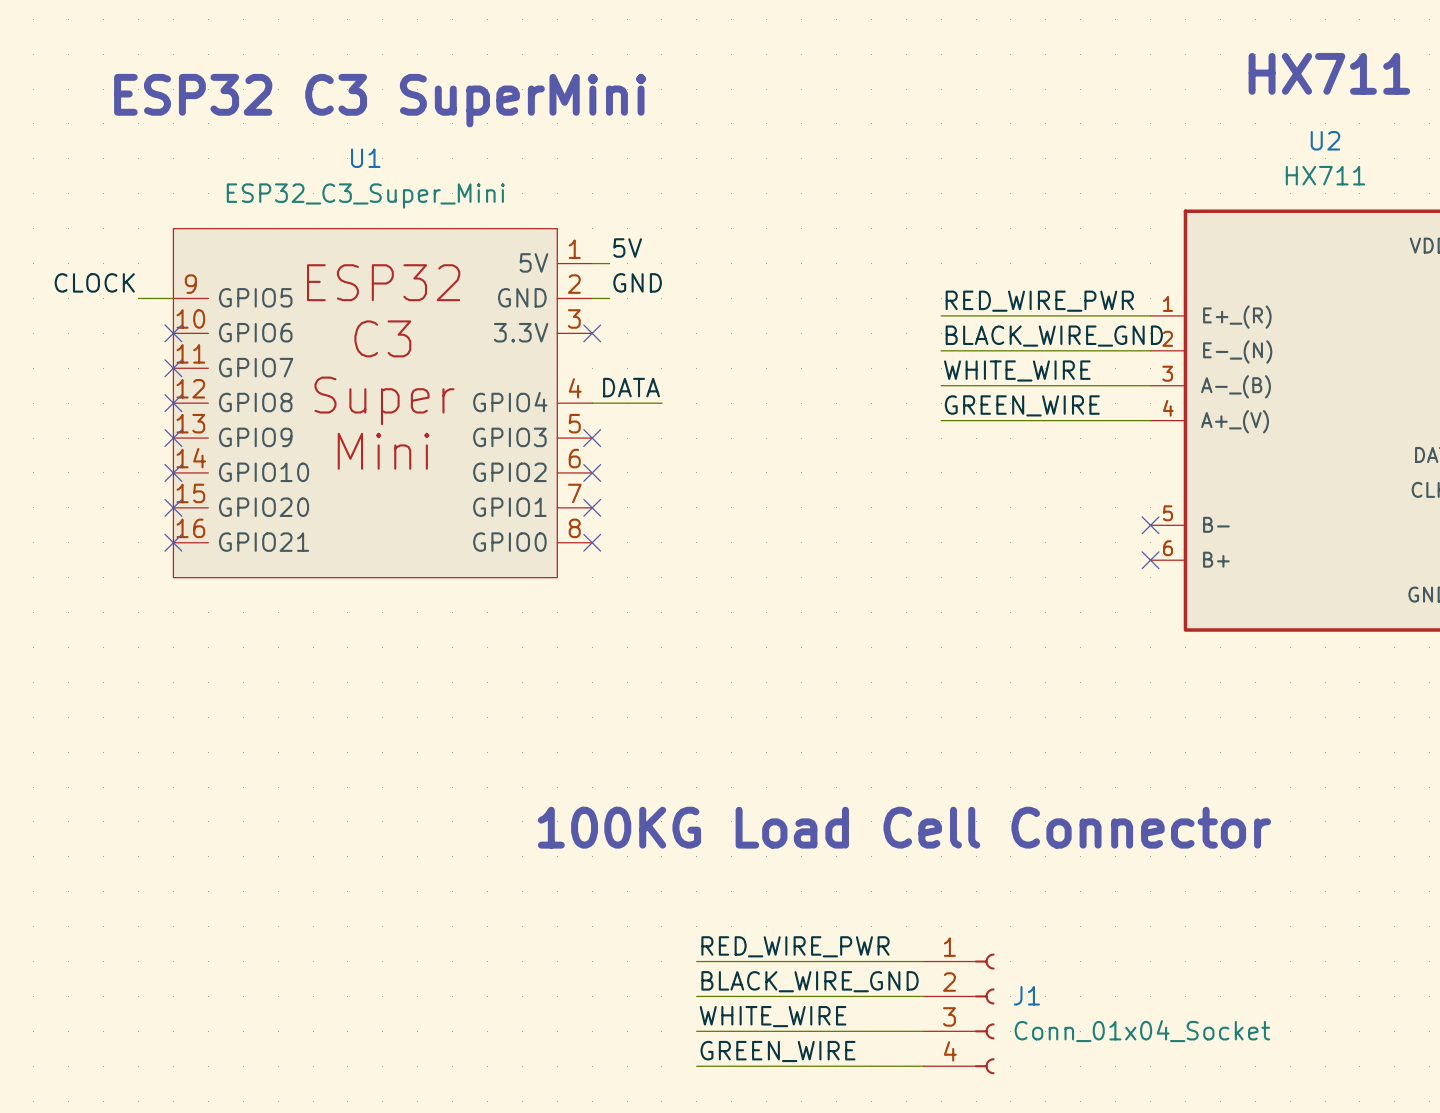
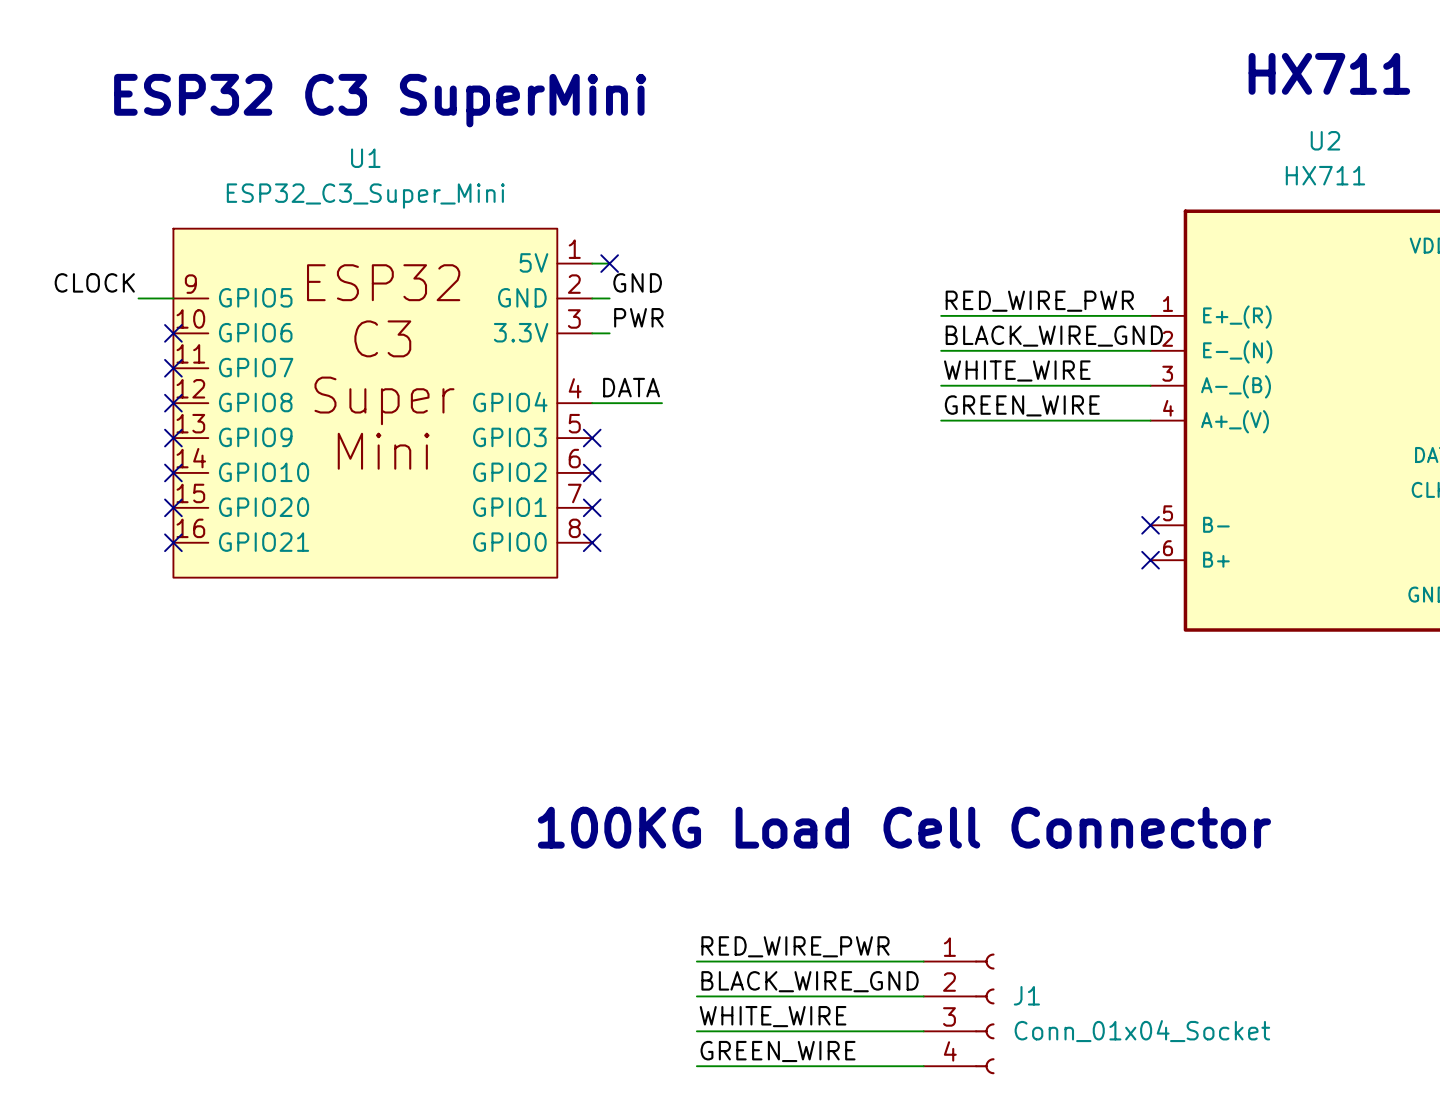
label: 5V (627, 248) -> none
label: none -> PWR (638, 317)
wire: none -> (592, 333) (609, 333)
no-connect mark position: (592, 333) -> (609, 263)

